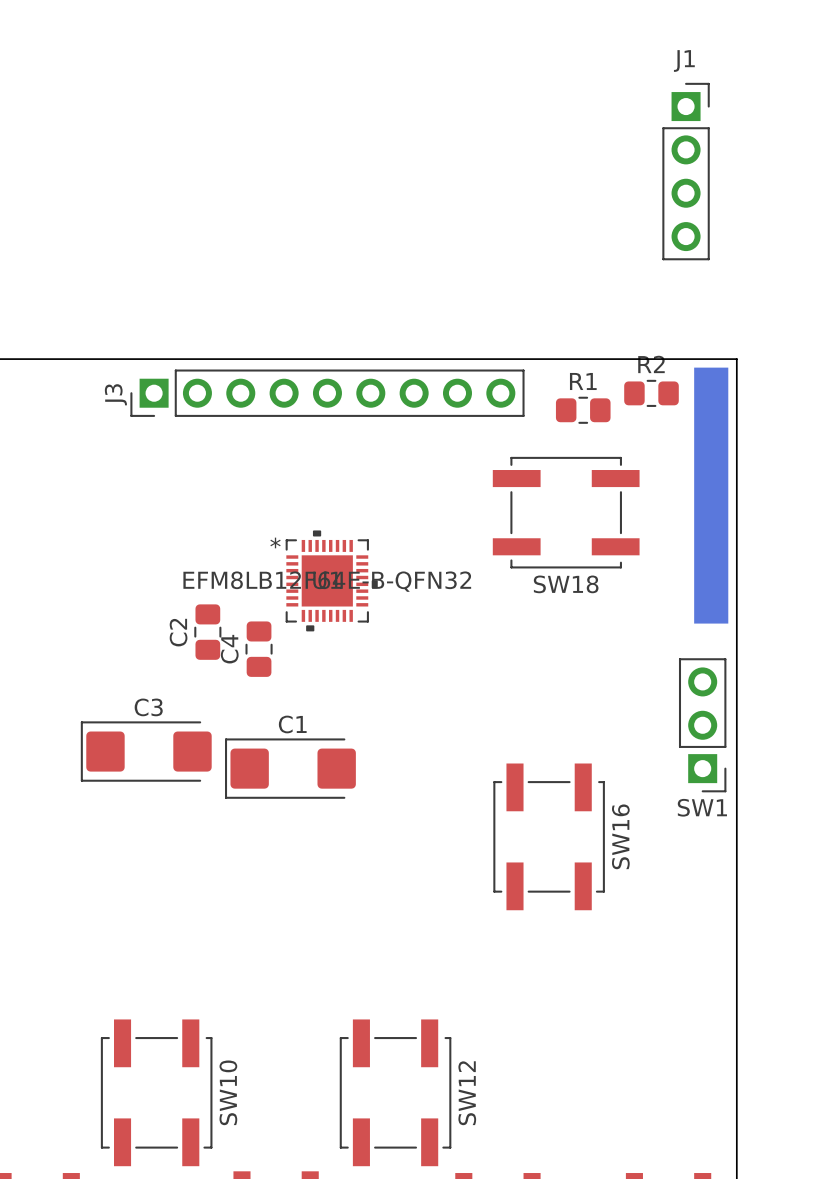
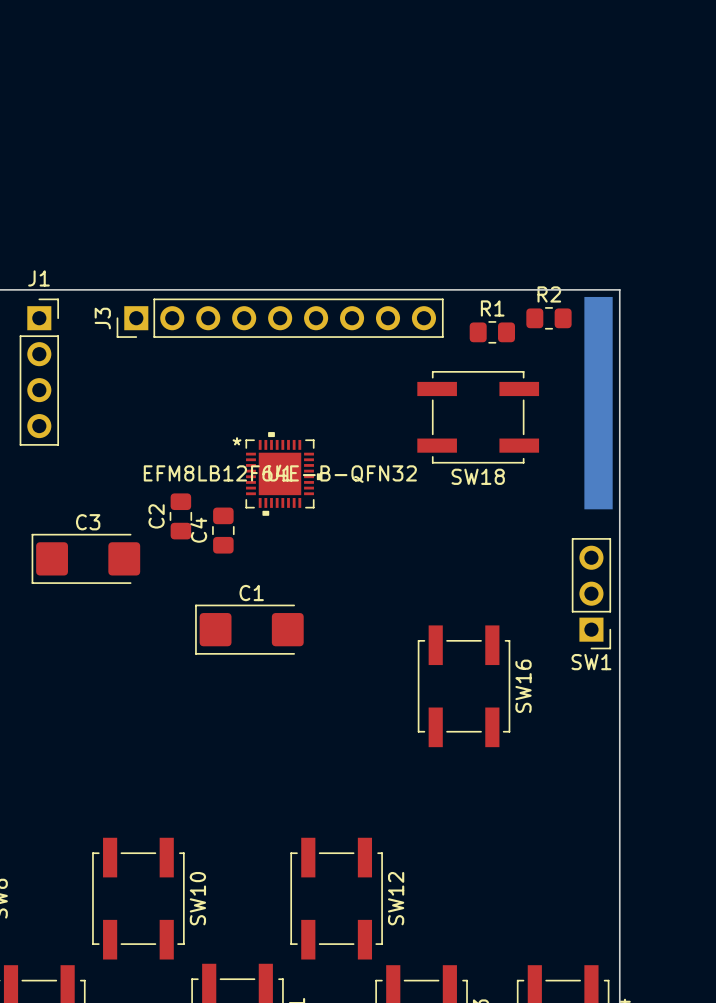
J1 position: (686, 171) -> (39, 372)
C3 position: (146, 751) -> (85, 558)

